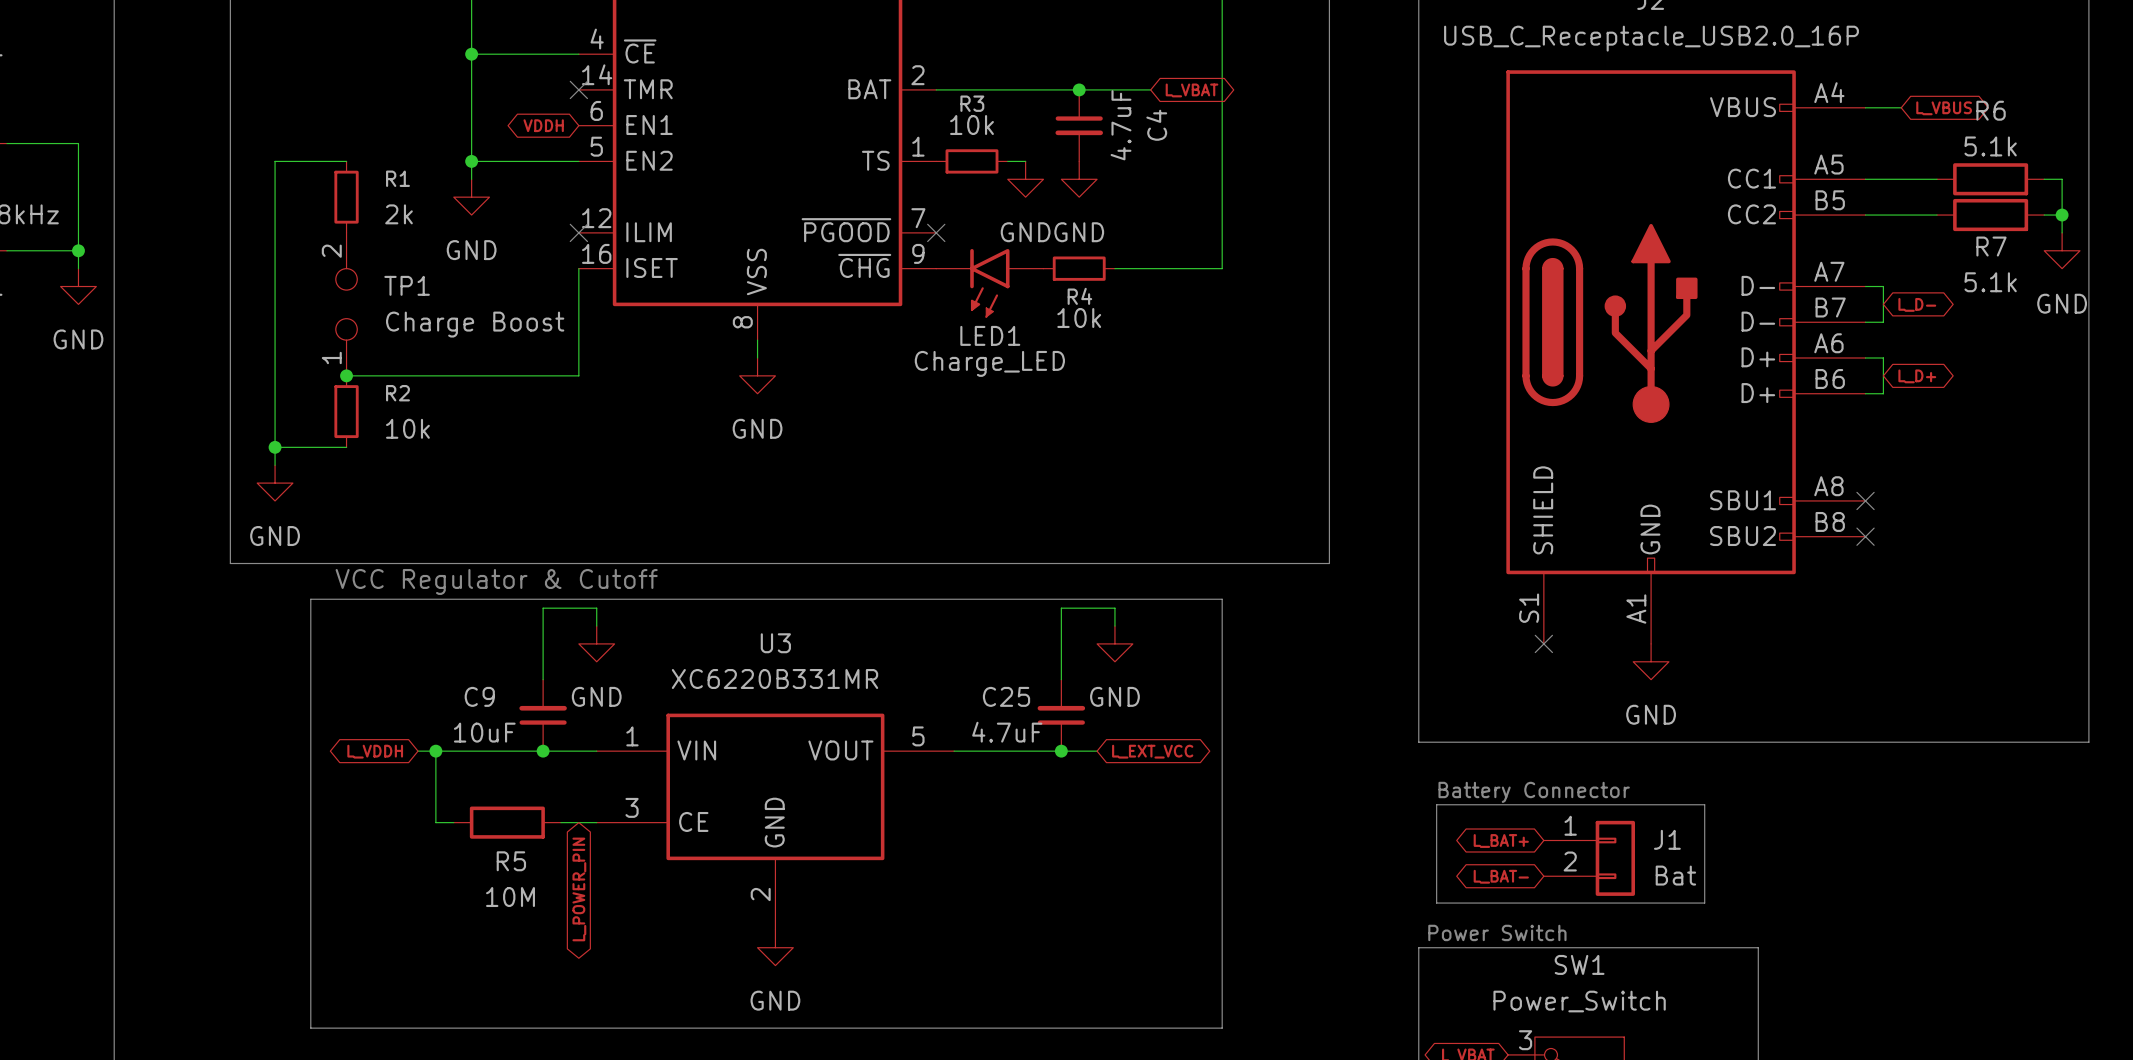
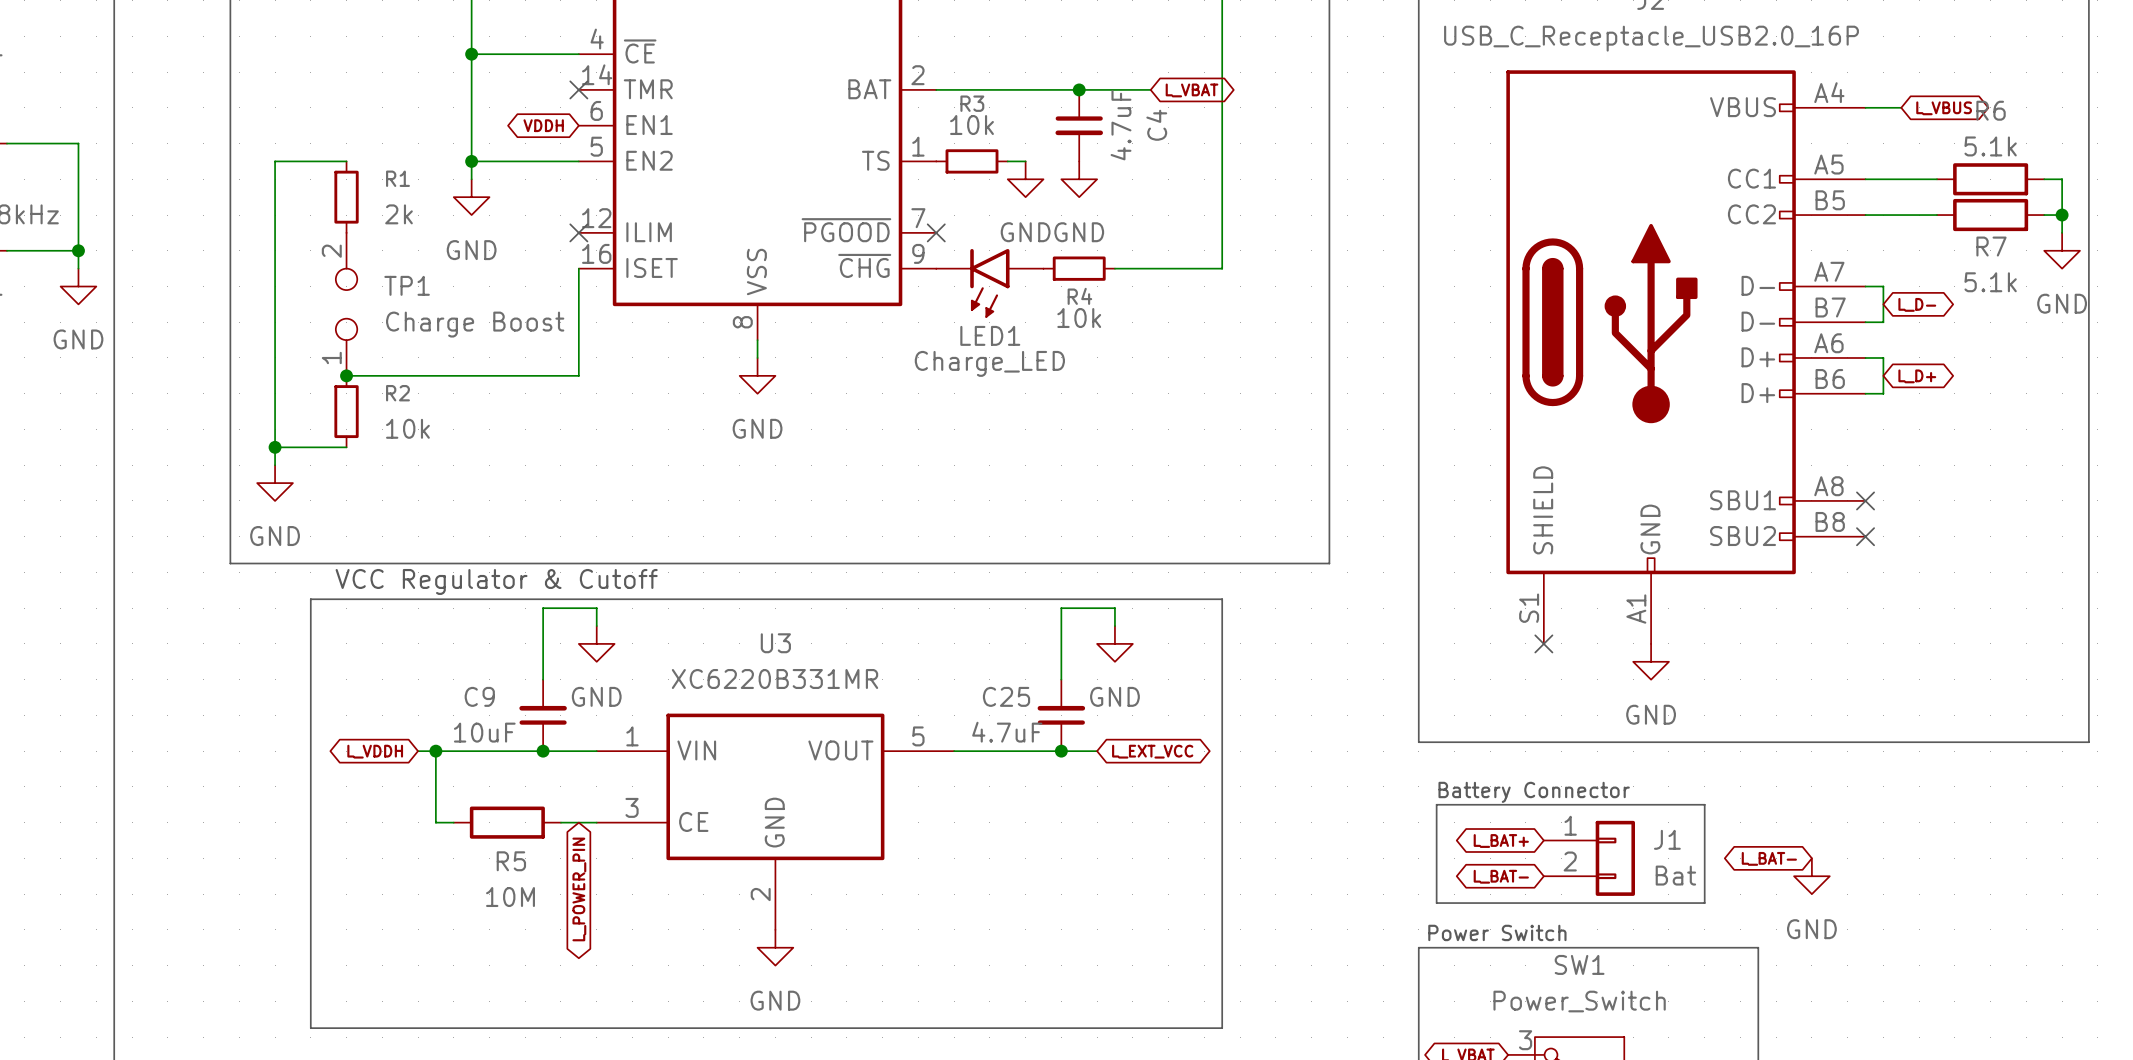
global label: none -> L_BAT- (1769, 858)
power symbol: none -> GND (1811, 876)

